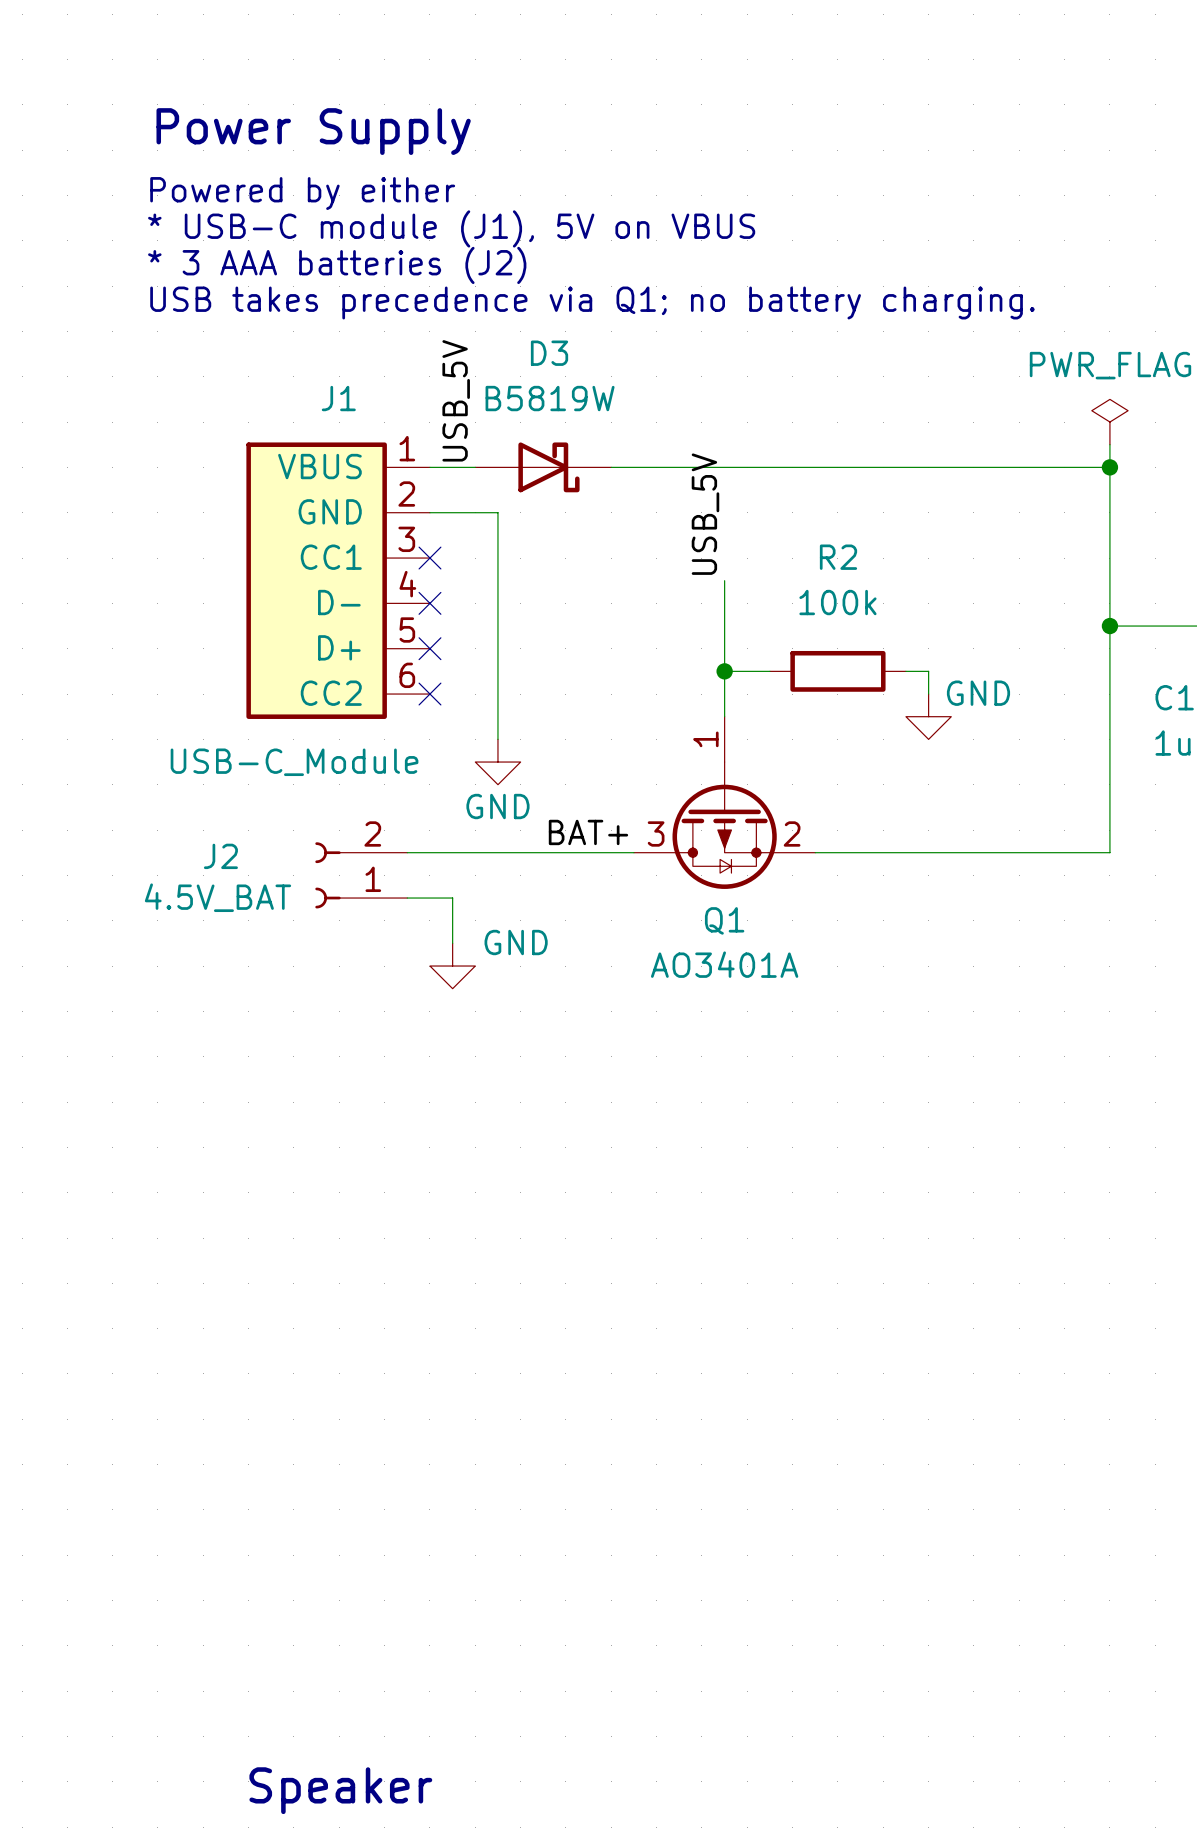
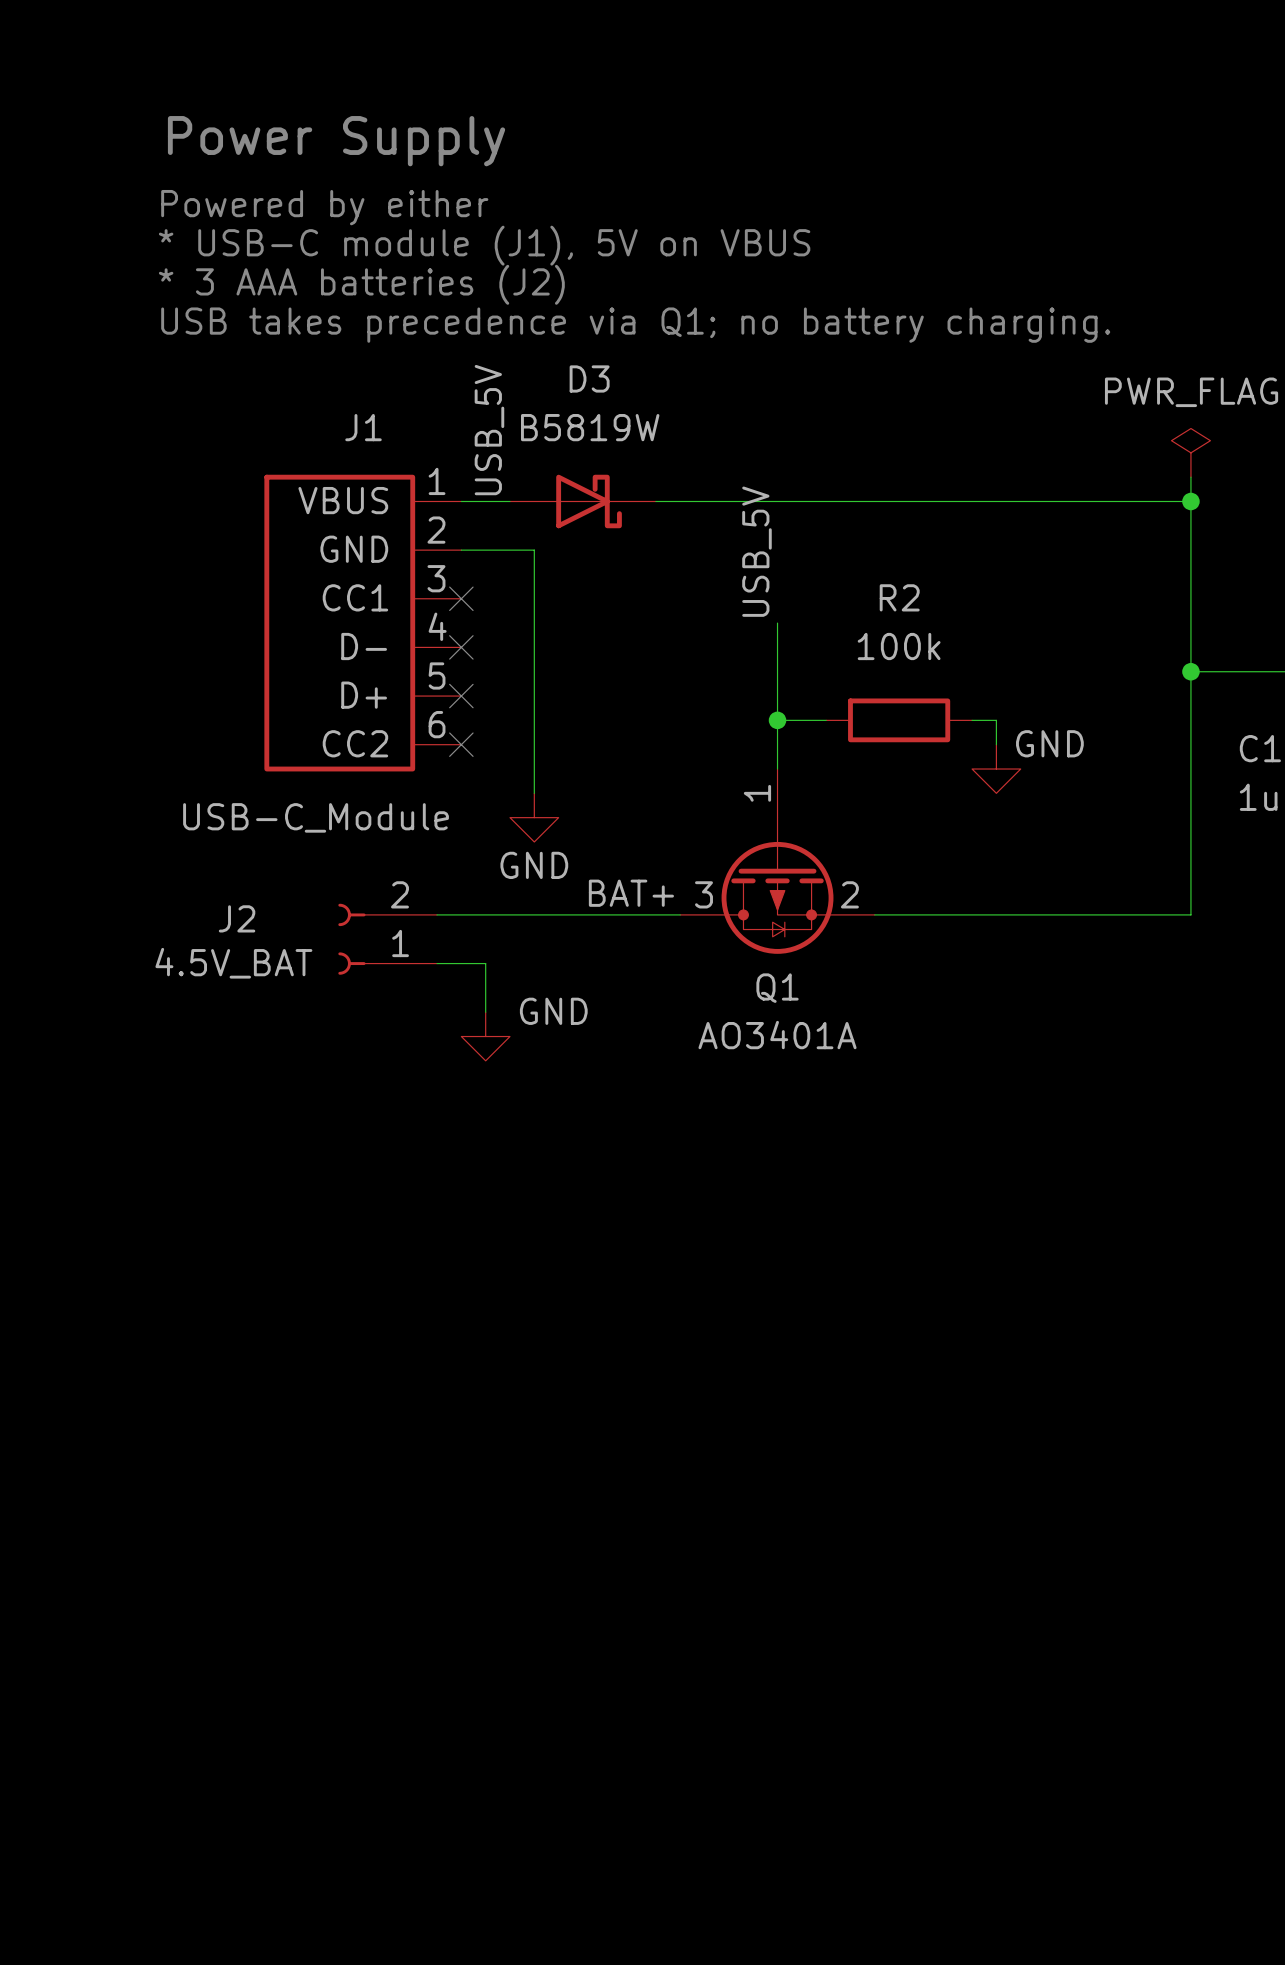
text: Speaker (340, 1790) -> none

